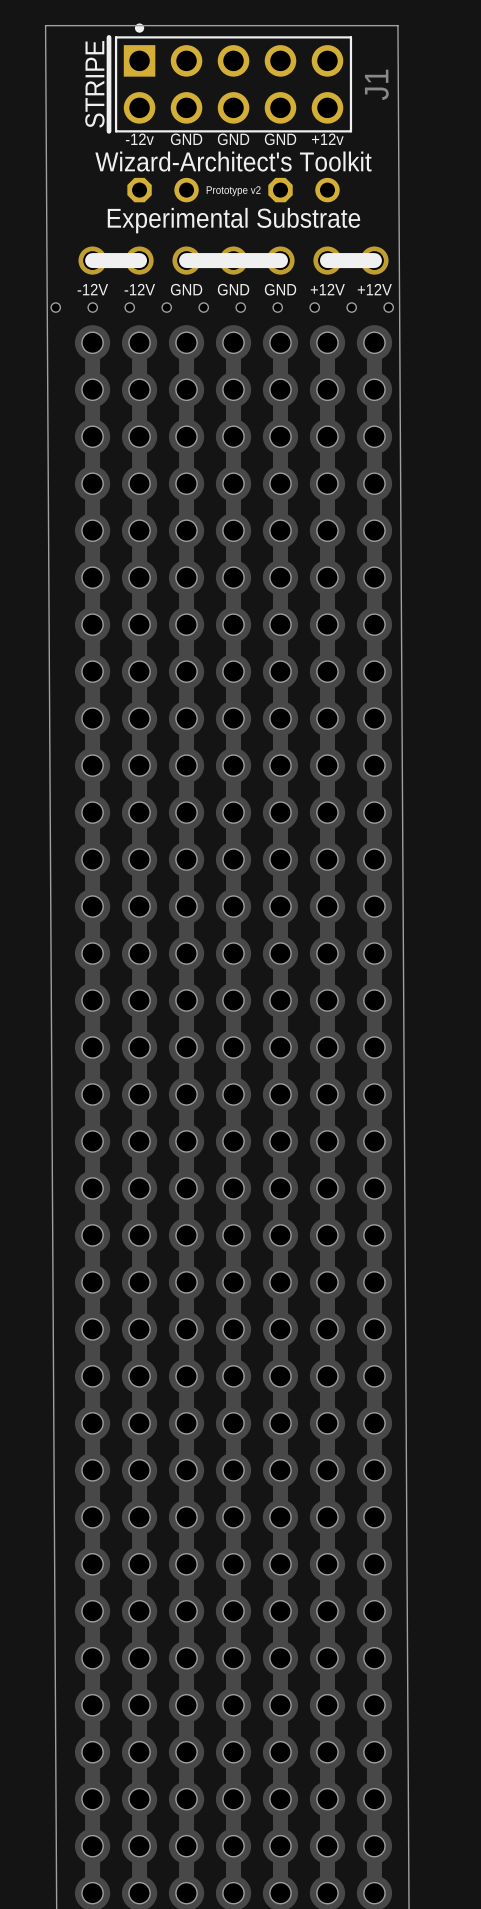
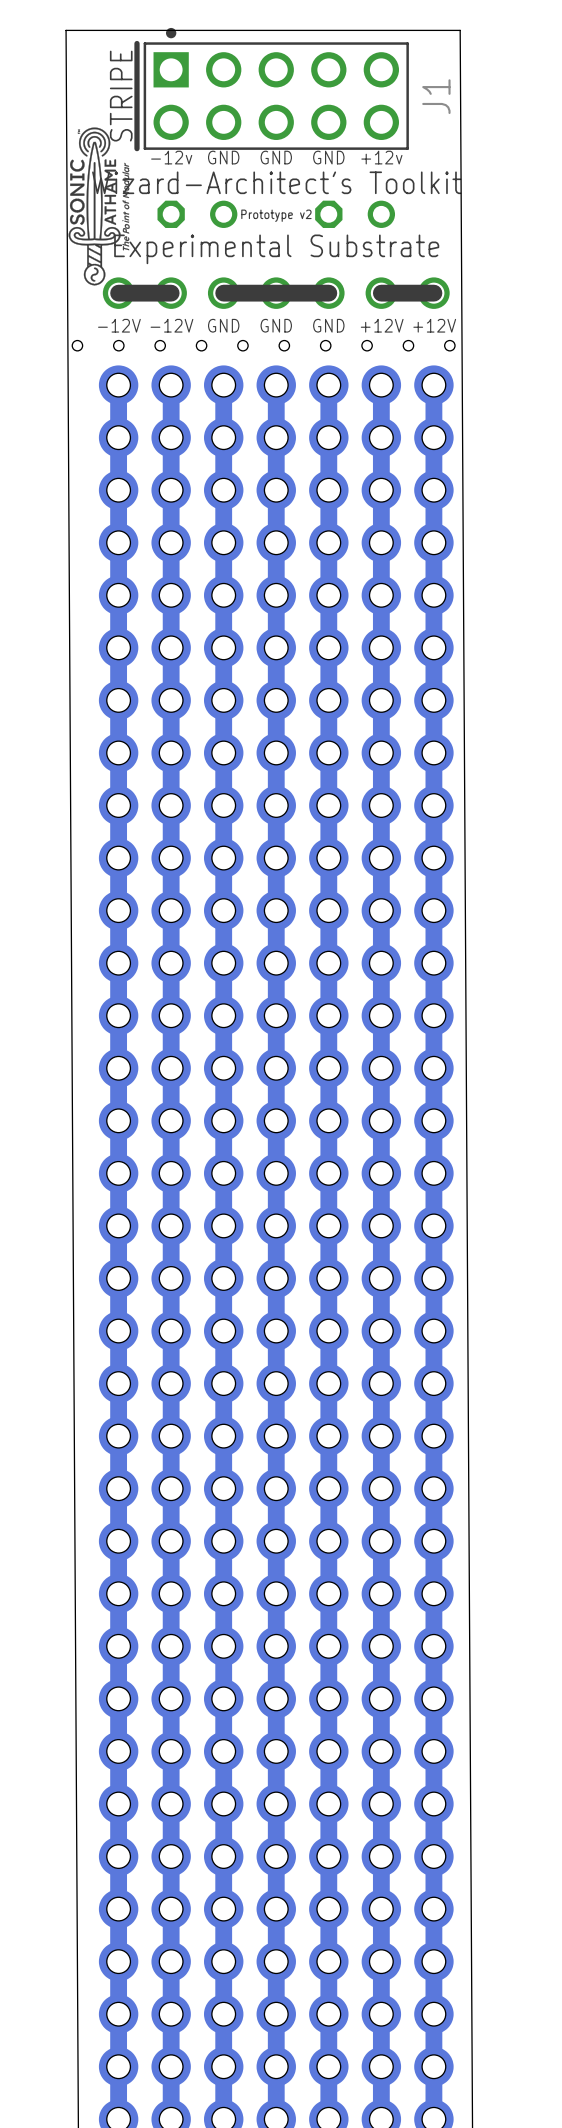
drawing: none -> [68, 127, 130, 286]

